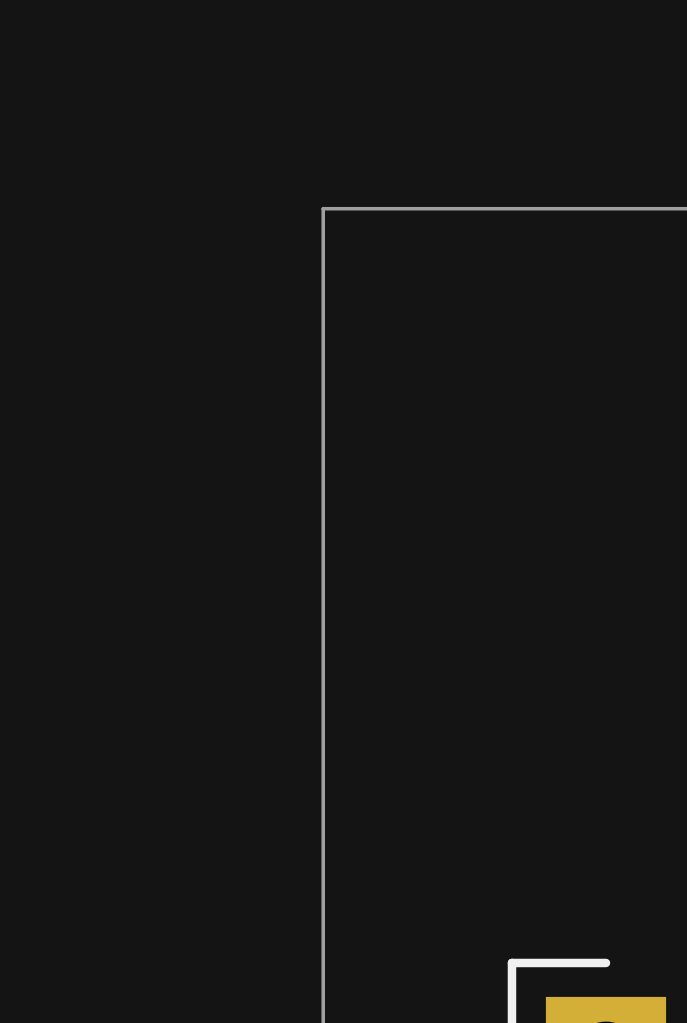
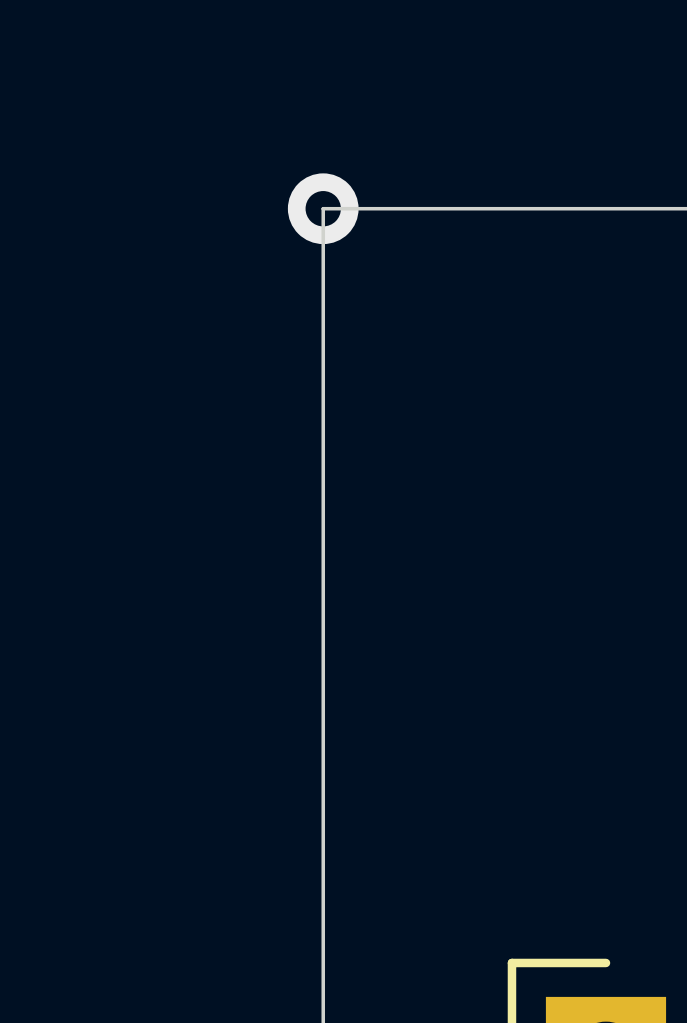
via: none -> (323, 208)

